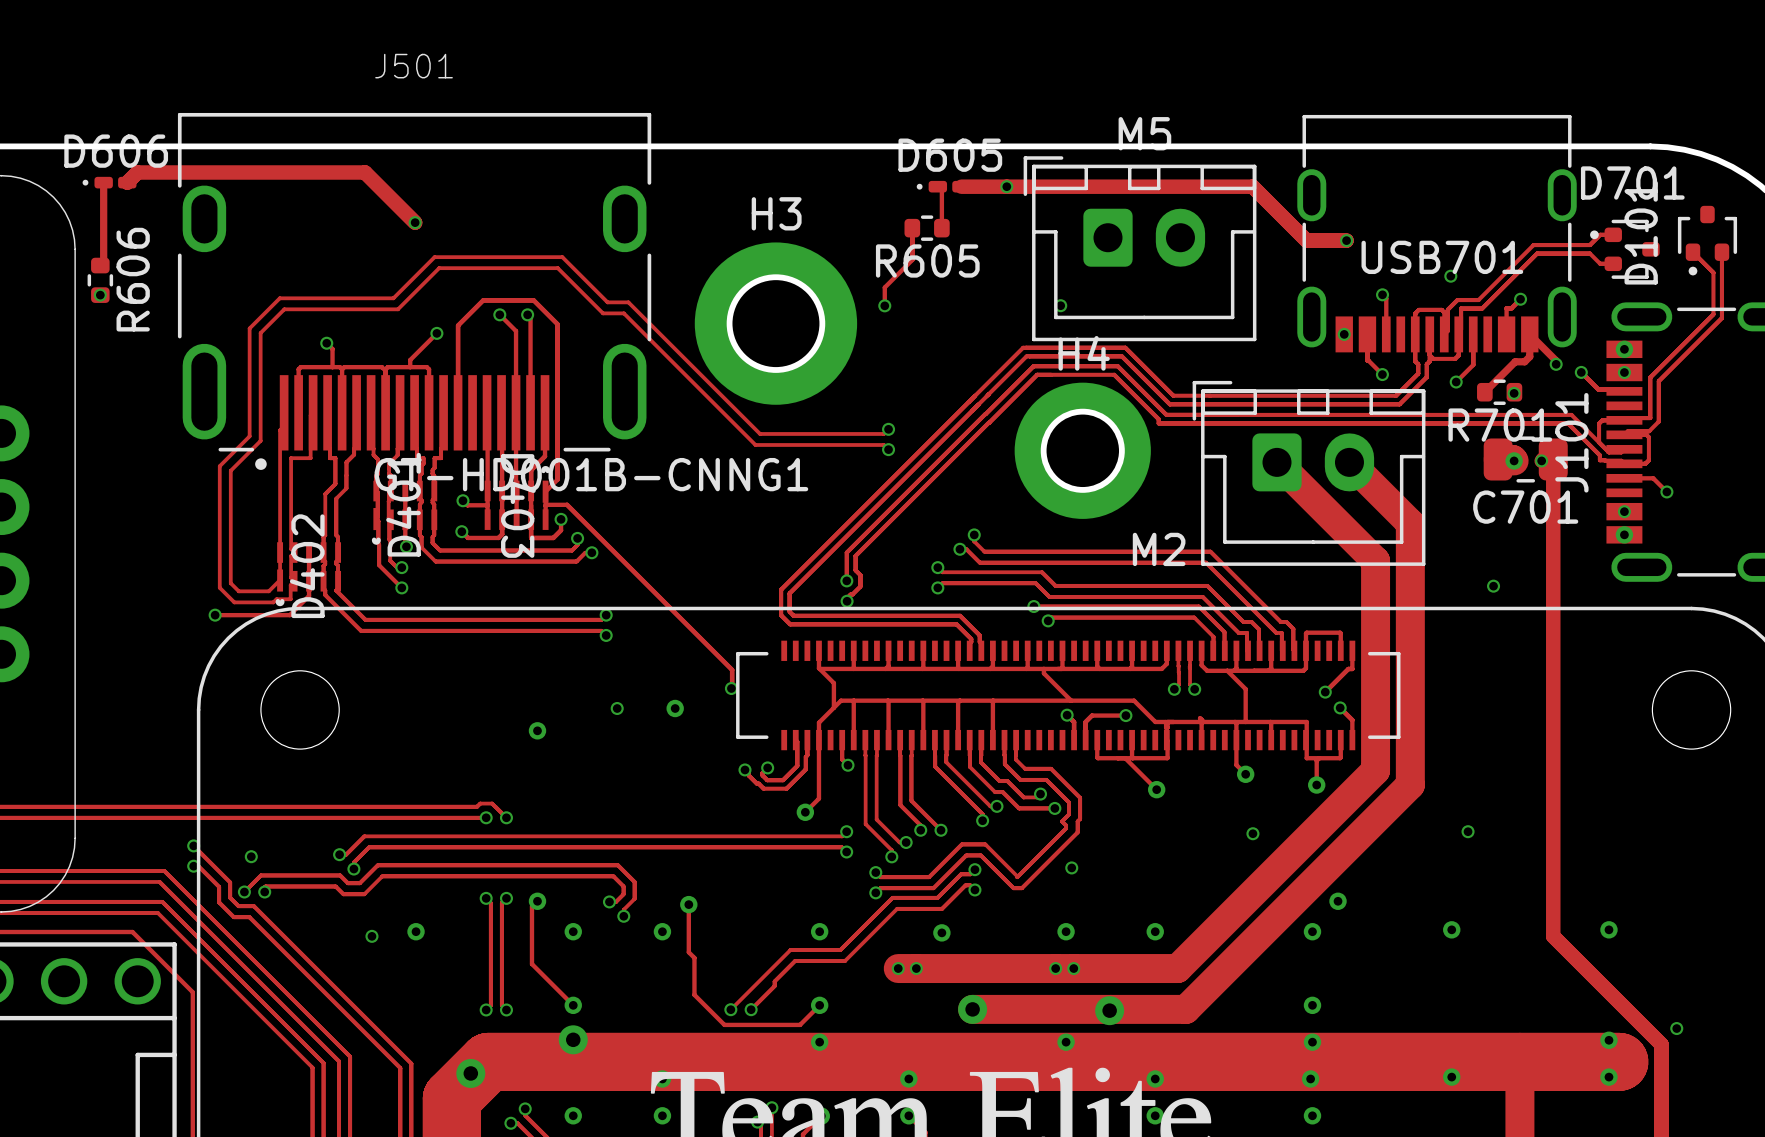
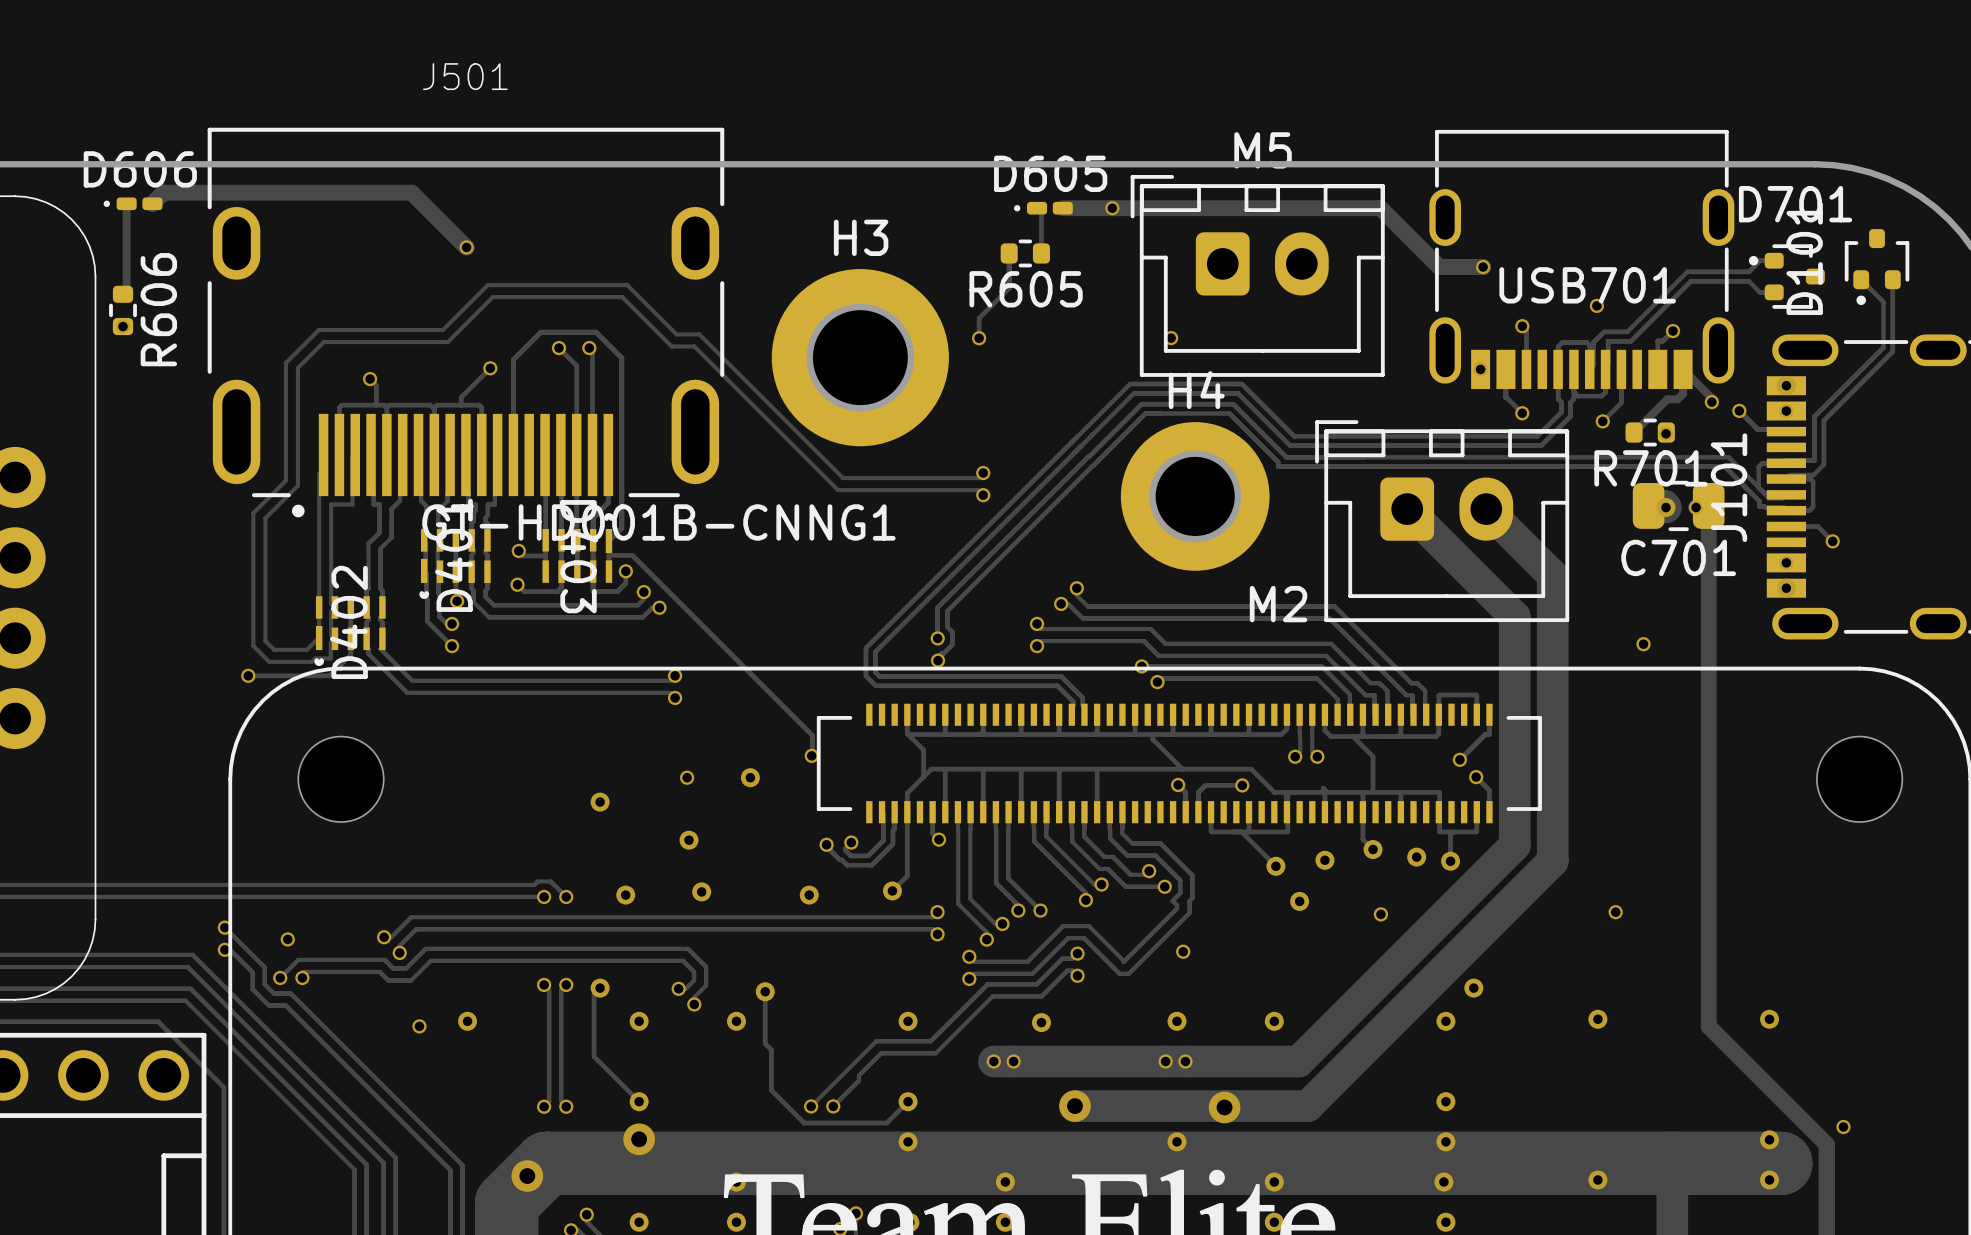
via: none -> (689, 840)
via: none -> (1416, 857)
via: none -> (1324, 860)
via: none -> (701, 891)
via: none -> (625, 895)
via: none -> (809, 895)
via: none -> (1299, 901)

